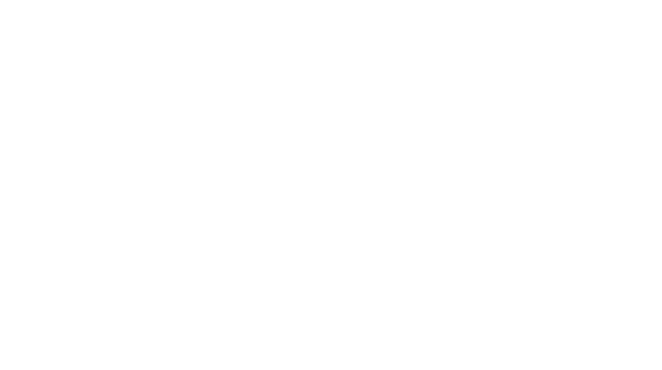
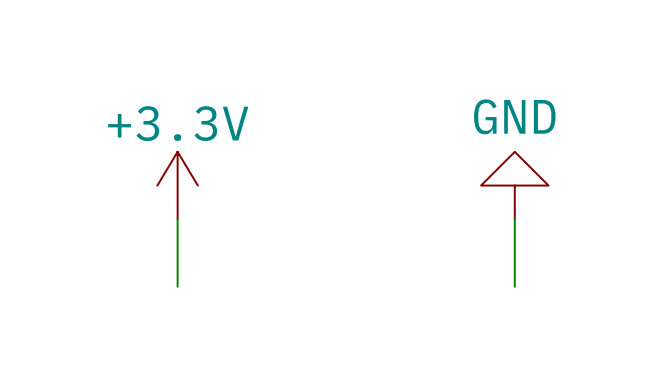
power symbol: none -> +3.3V (177, 185)
power symbol: none -> GND (514, 185)
wire: none -> (177, 219) (177, 286)
wire: none -> (514, 219) (514, 286)

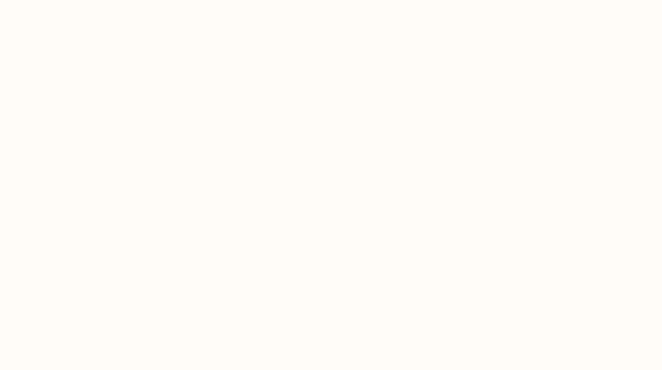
power symbol: +3.3V (177, 185) -> none
power symbol: GND (514, 185) -> none
wire: (177, 219) (177, 286) -> none
wire: (514, 219) (514, 286) -> none

